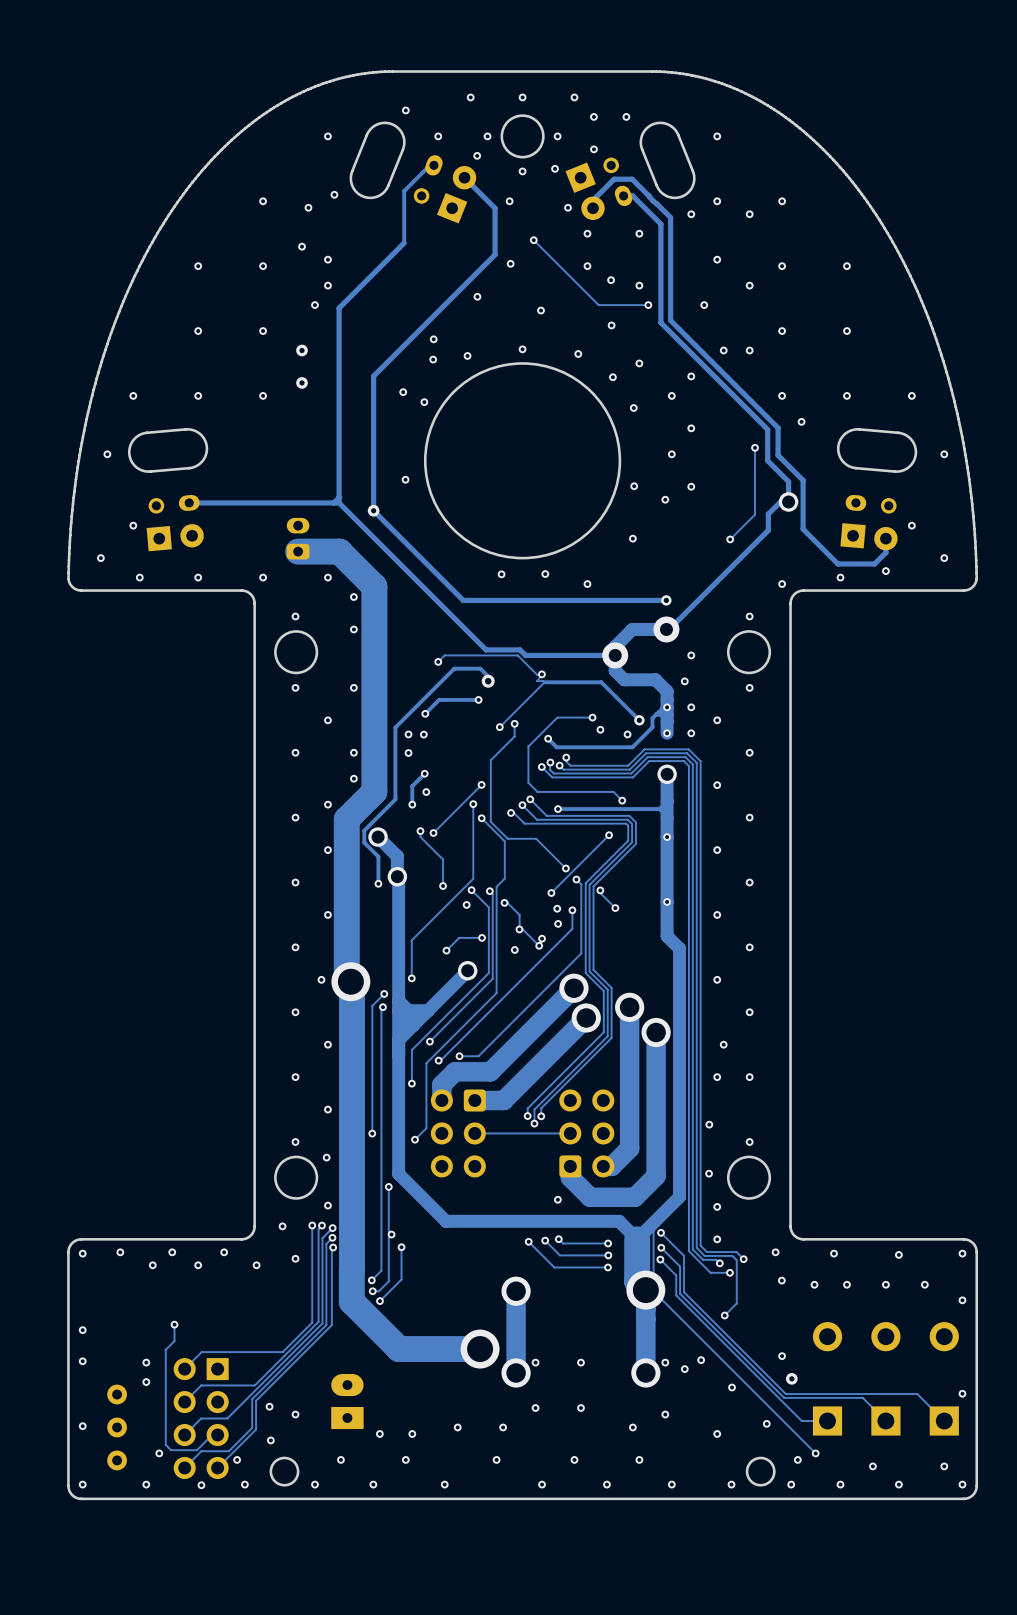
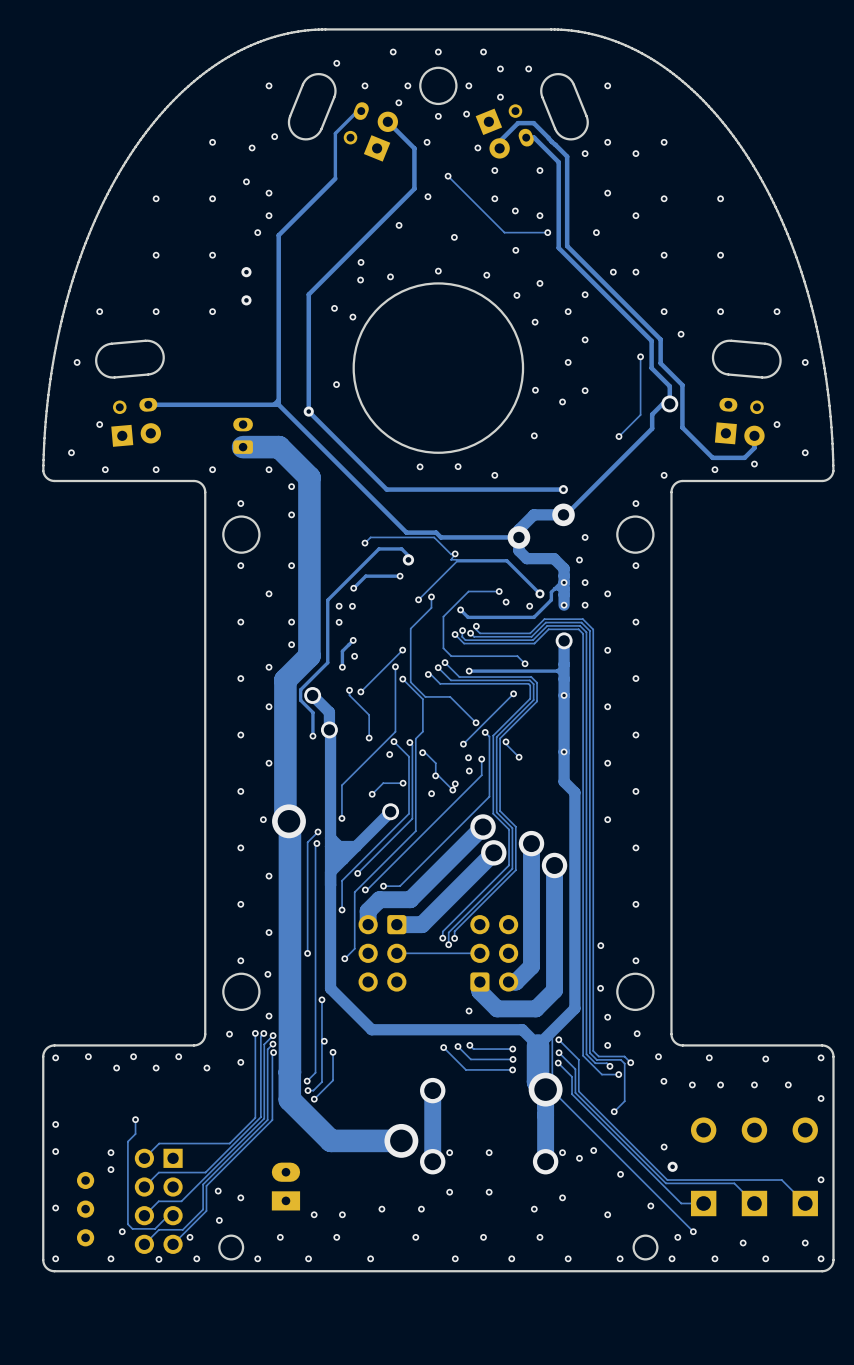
via: (723, 1044) -> none
via: (717, 1077) -> none
via: none -> (637, 1033)

